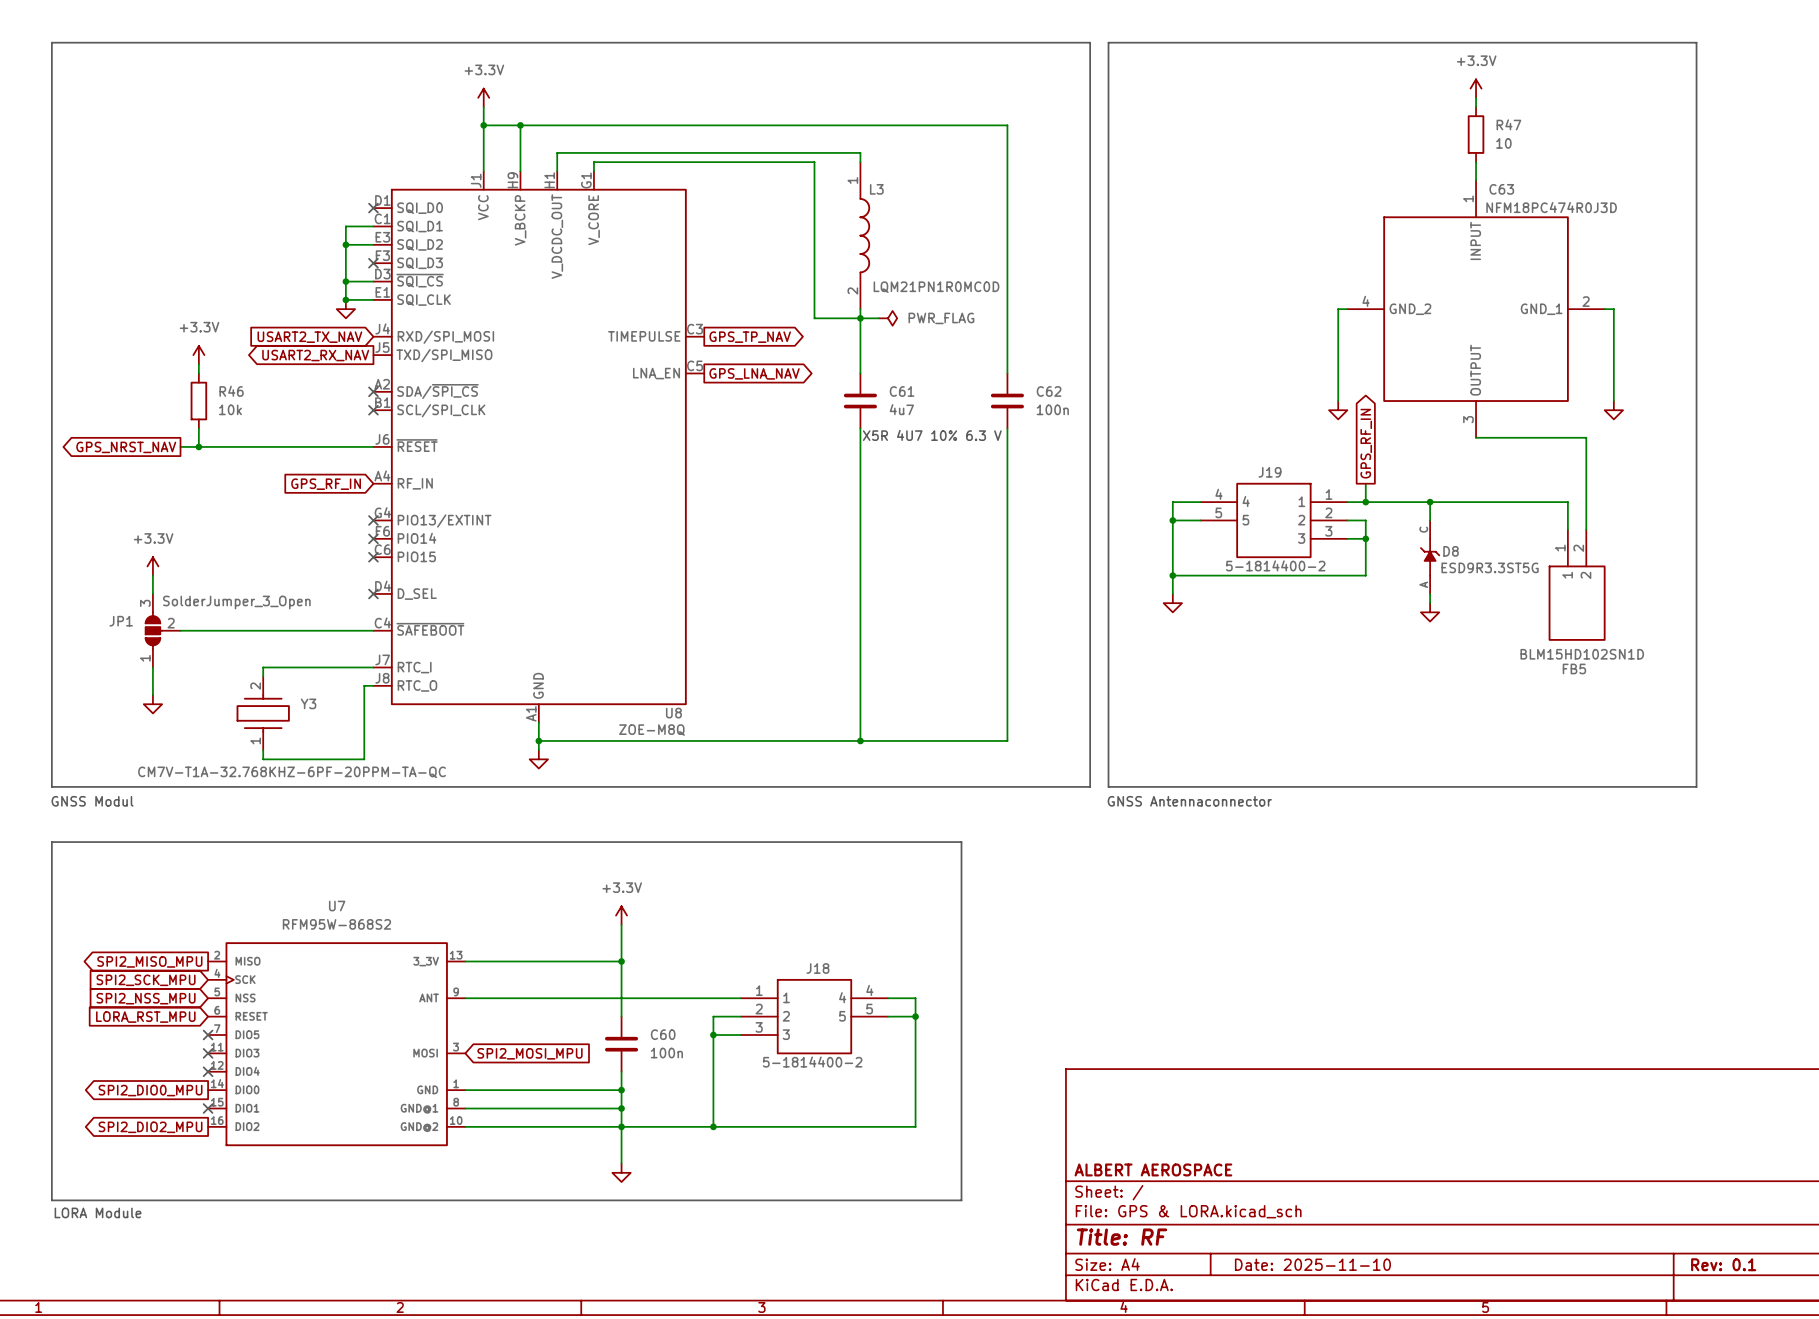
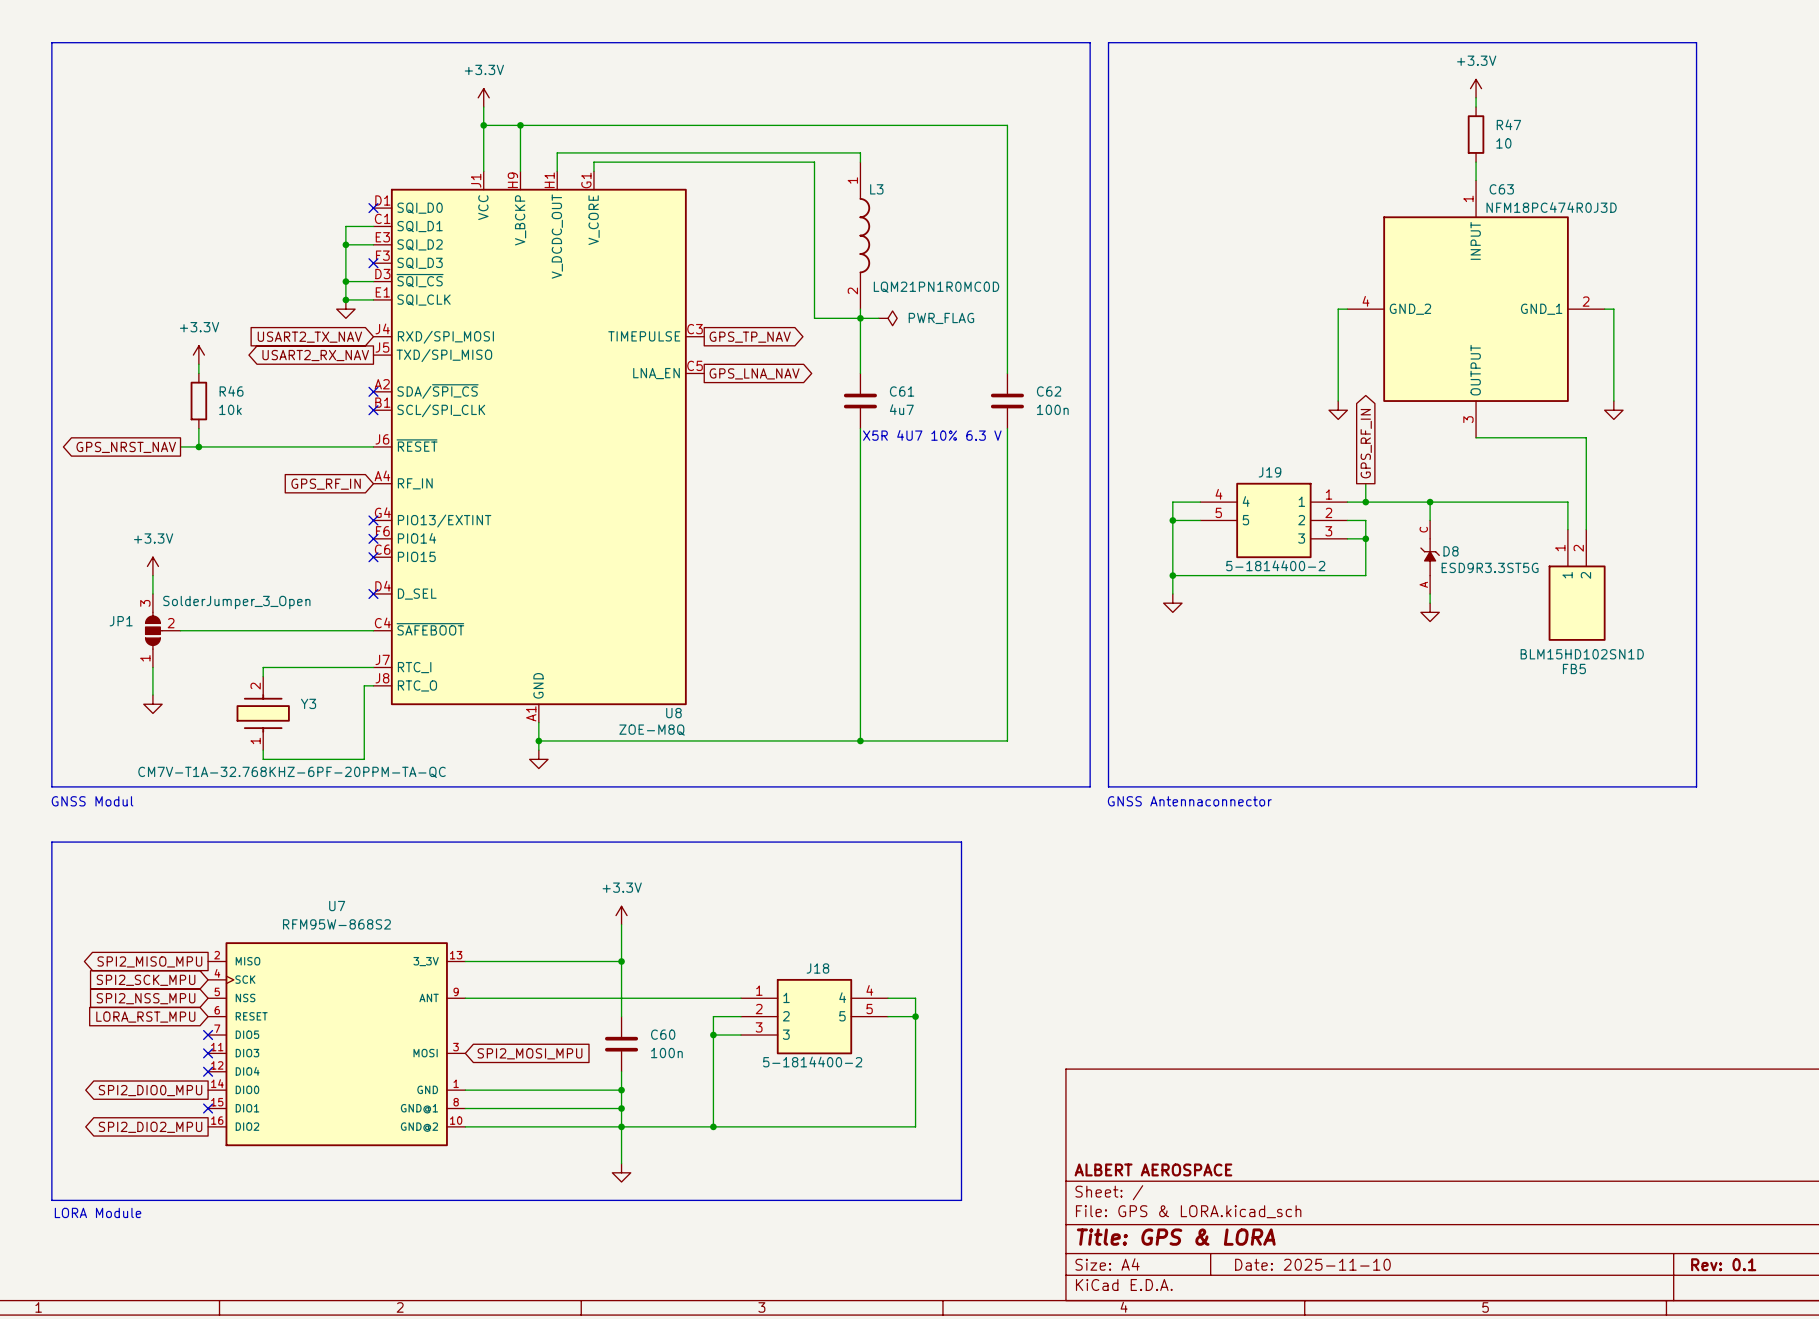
title block: Title: RF (1122, 1237) -> Title: GPS & LORA (1176, 1237)

